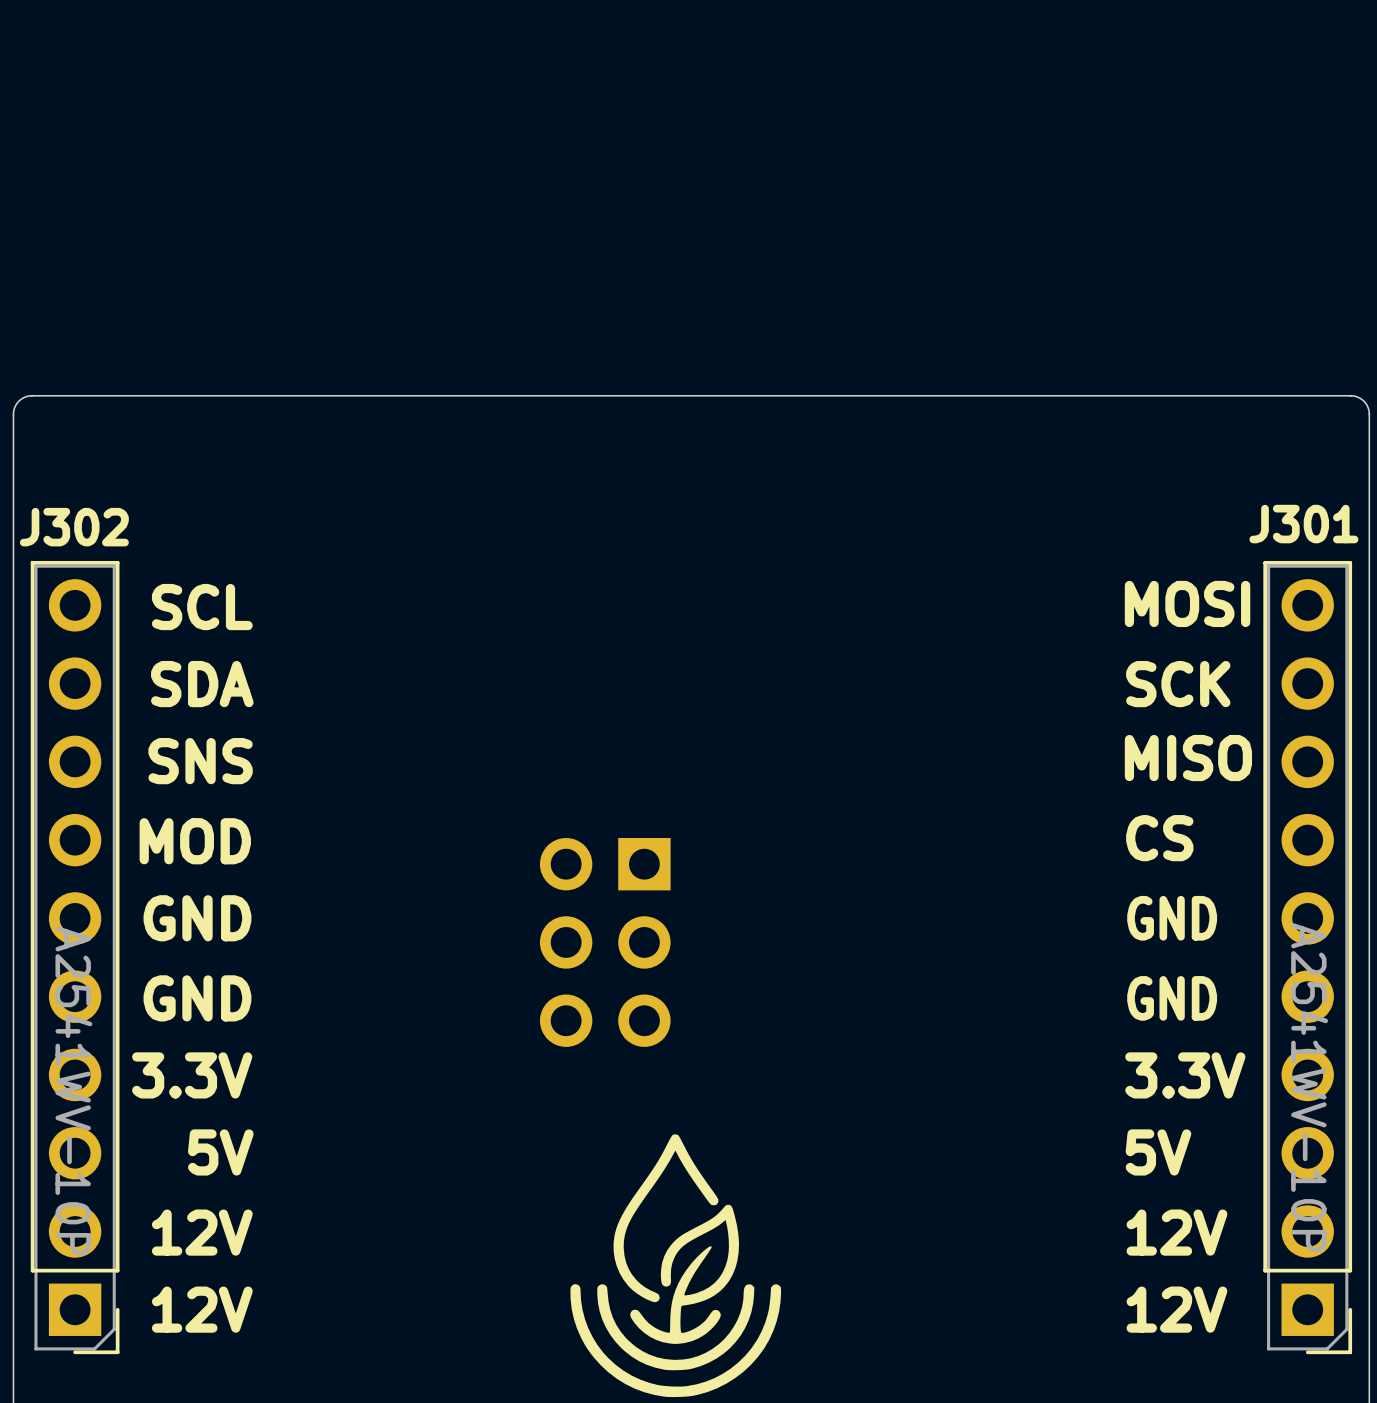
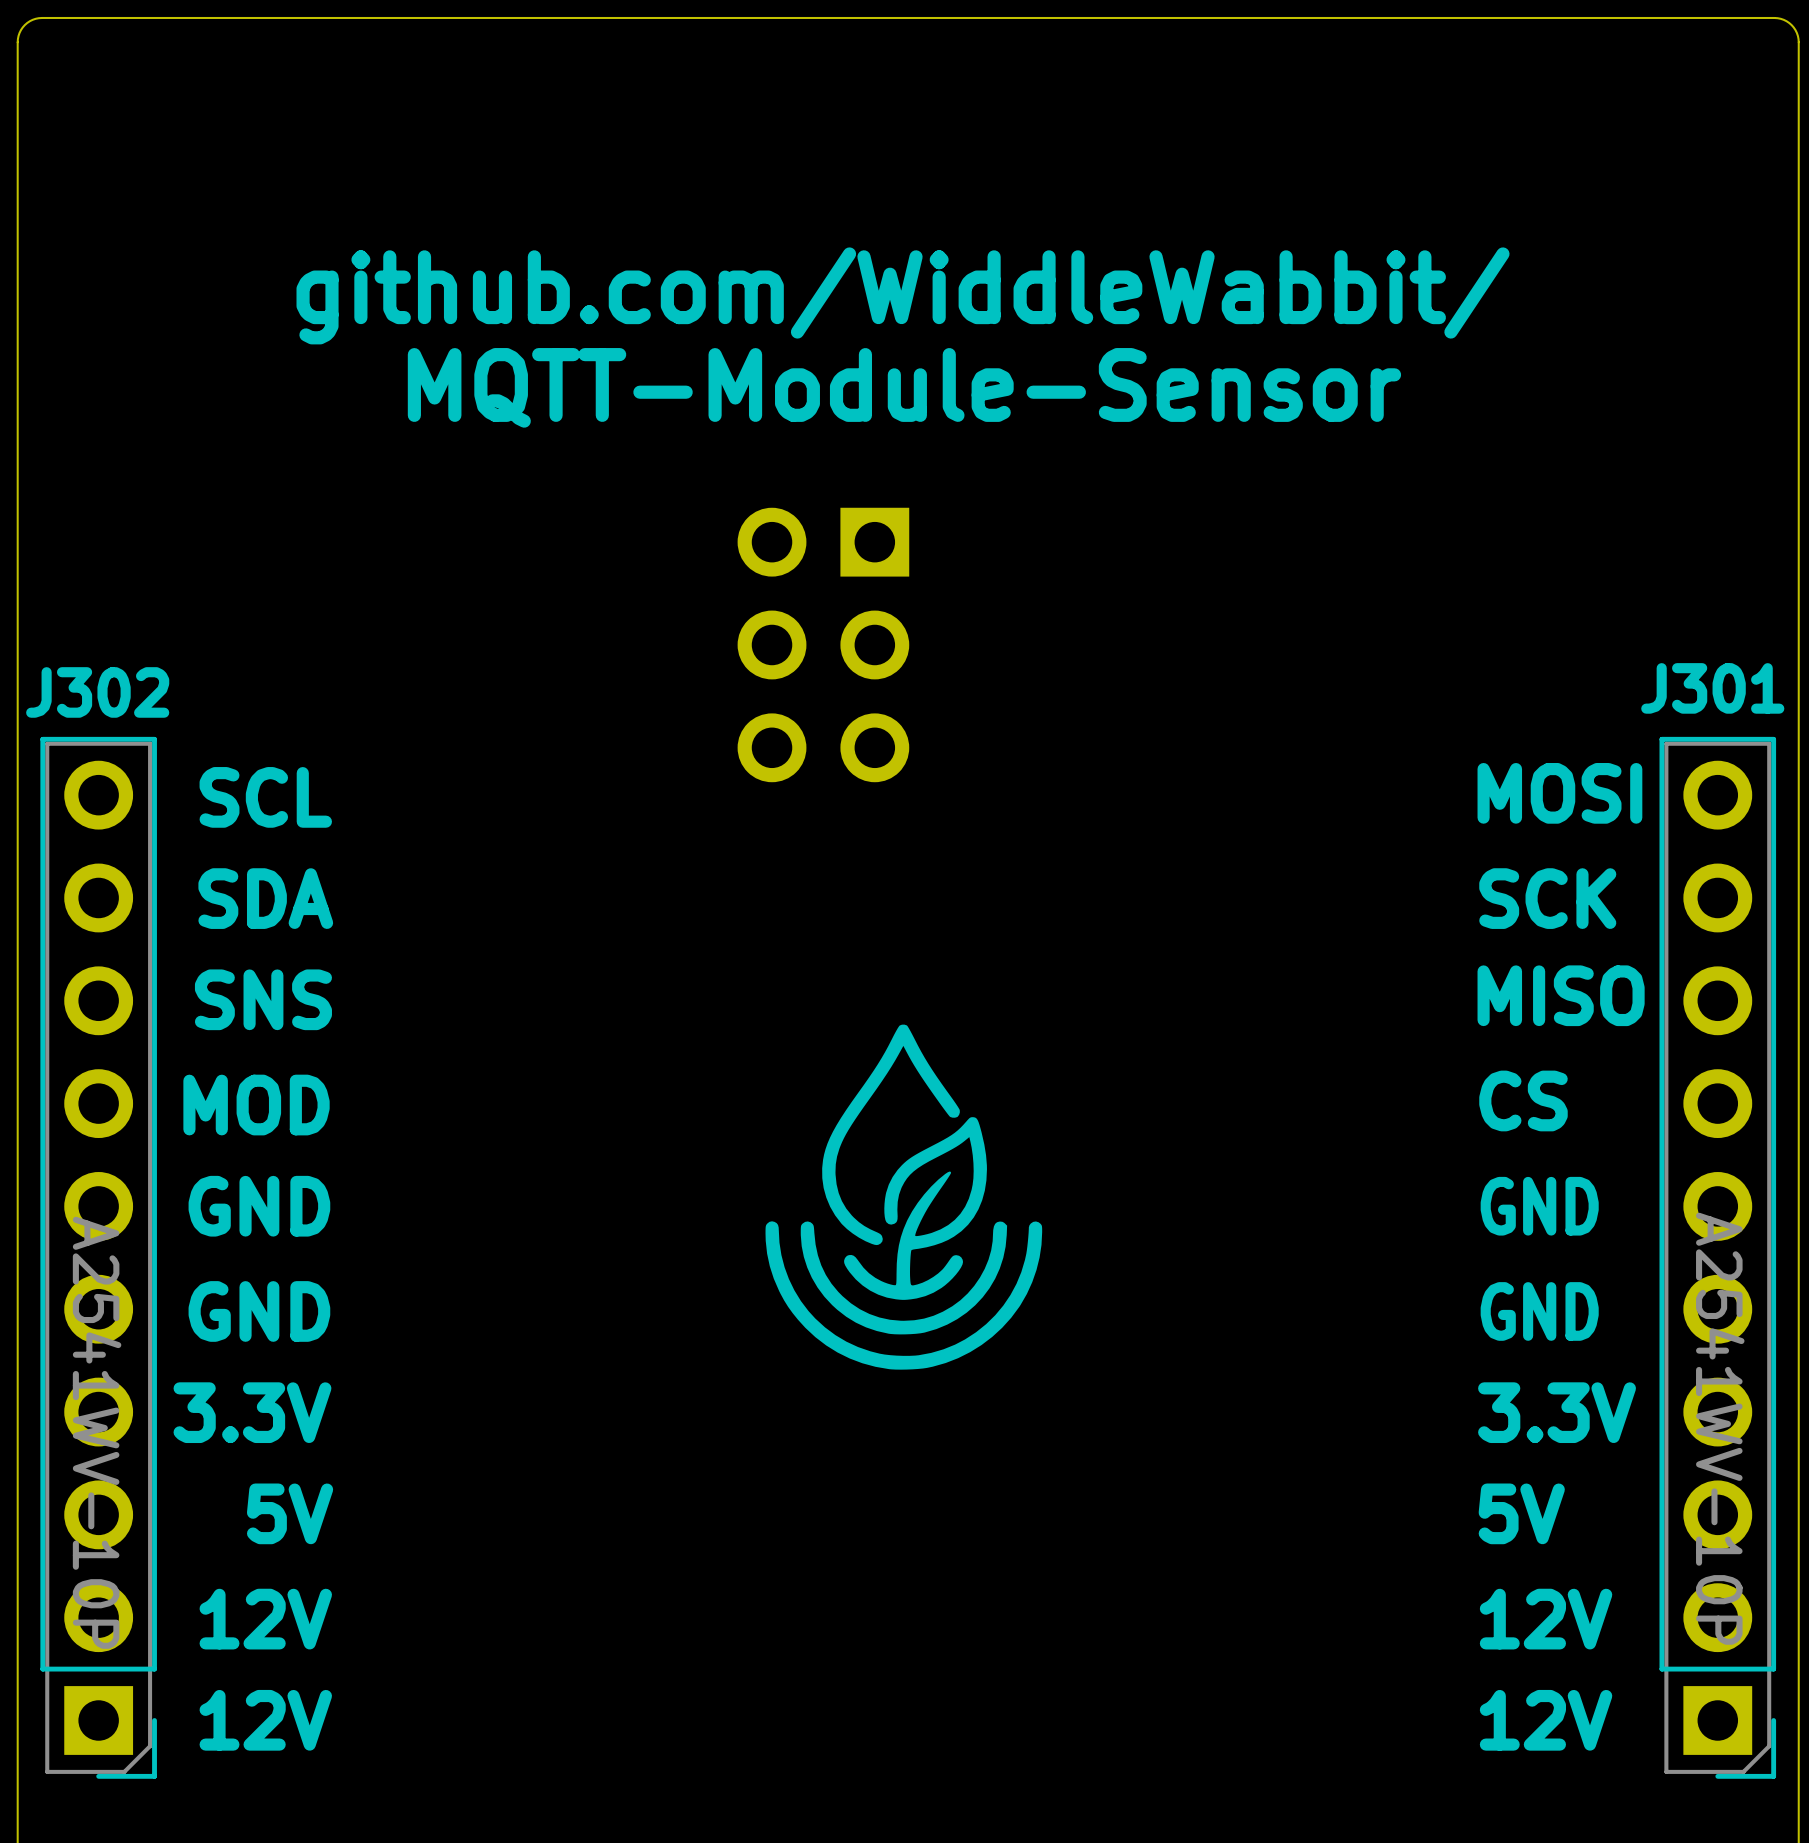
text: none -> github.com/WiddleWabbit/ (903, 295)
text: none -> MQTT-Module-Sensor (904, 387)
board edge: (1369, 414) (1363, 401) (1350, 395) (31, 395) (18, 401) (13, 414) -> (1798, 544) (1798, 42) (1796, 32) (1791, 25) (1783, 19) (1774, 17) (35, 18) (22, 27) (17, 42) (17, 544)
part position: (605, 942) -> (823, 644)
drawing position: (675, 1265) -> (903, 1197)

